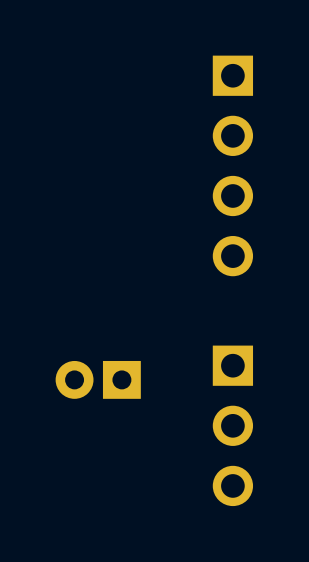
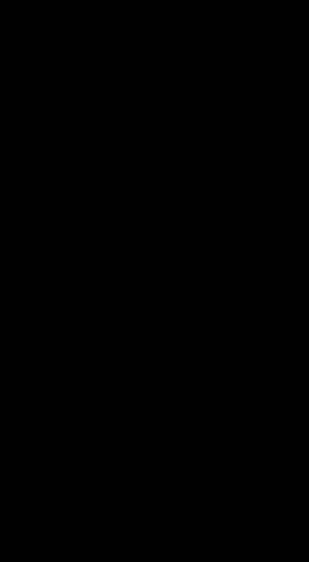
part: (232, 165) -> none
part: (98, 379) -> none
part: (232, 425) -> none

